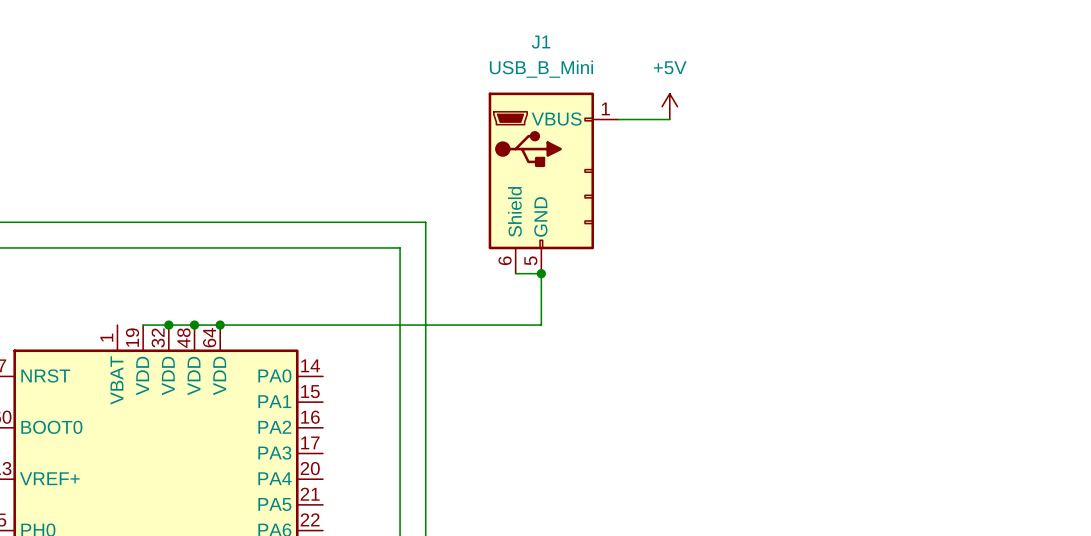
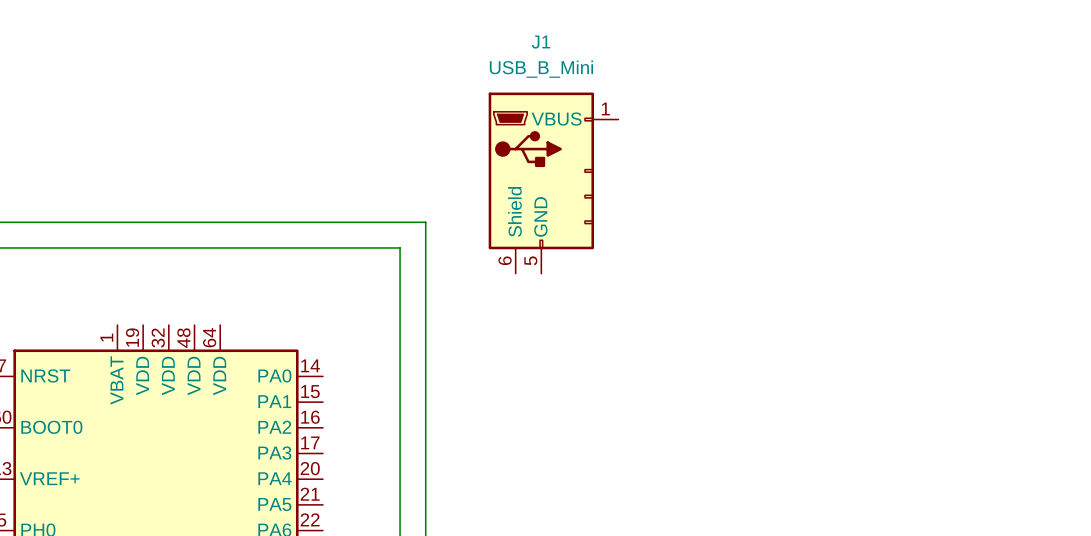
power symbol: +5V (669, 106) -> none
wire: (618, 119) (669, 119) -> none
wire: (515, 273) (541, 273) (541, 325) (143, 325) -> none
junction: (541, 273) -> none
junction: (168, 325) -> none
junction: (194, 325) -> none
junction: (220, 325) -> none

